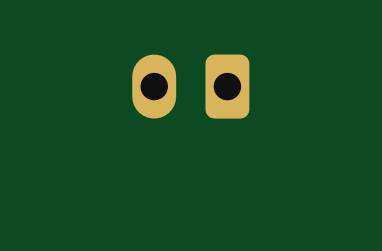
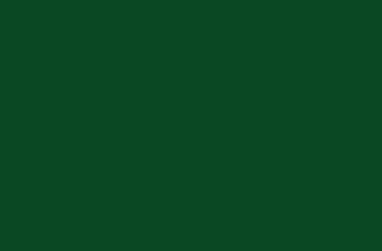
part: (190, 86) -> none

